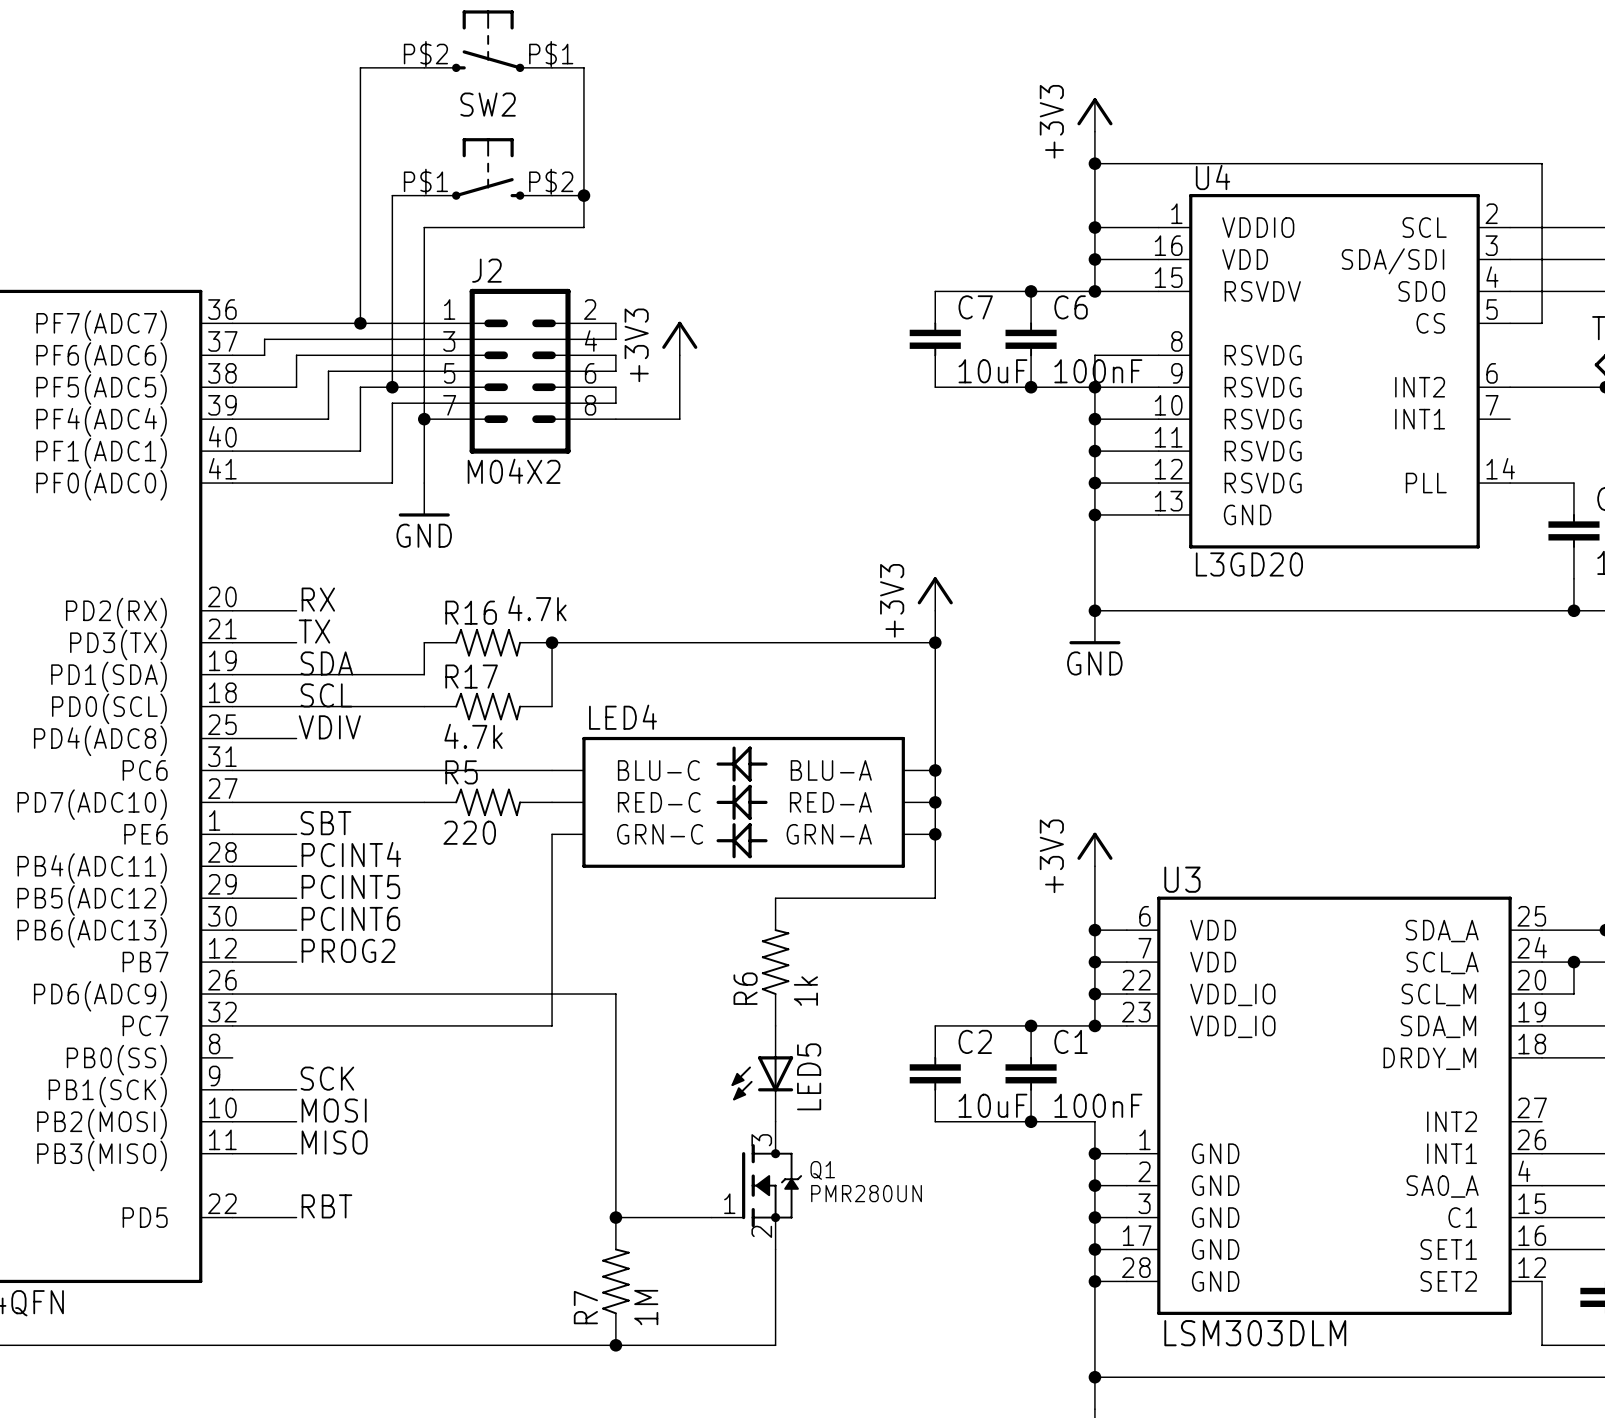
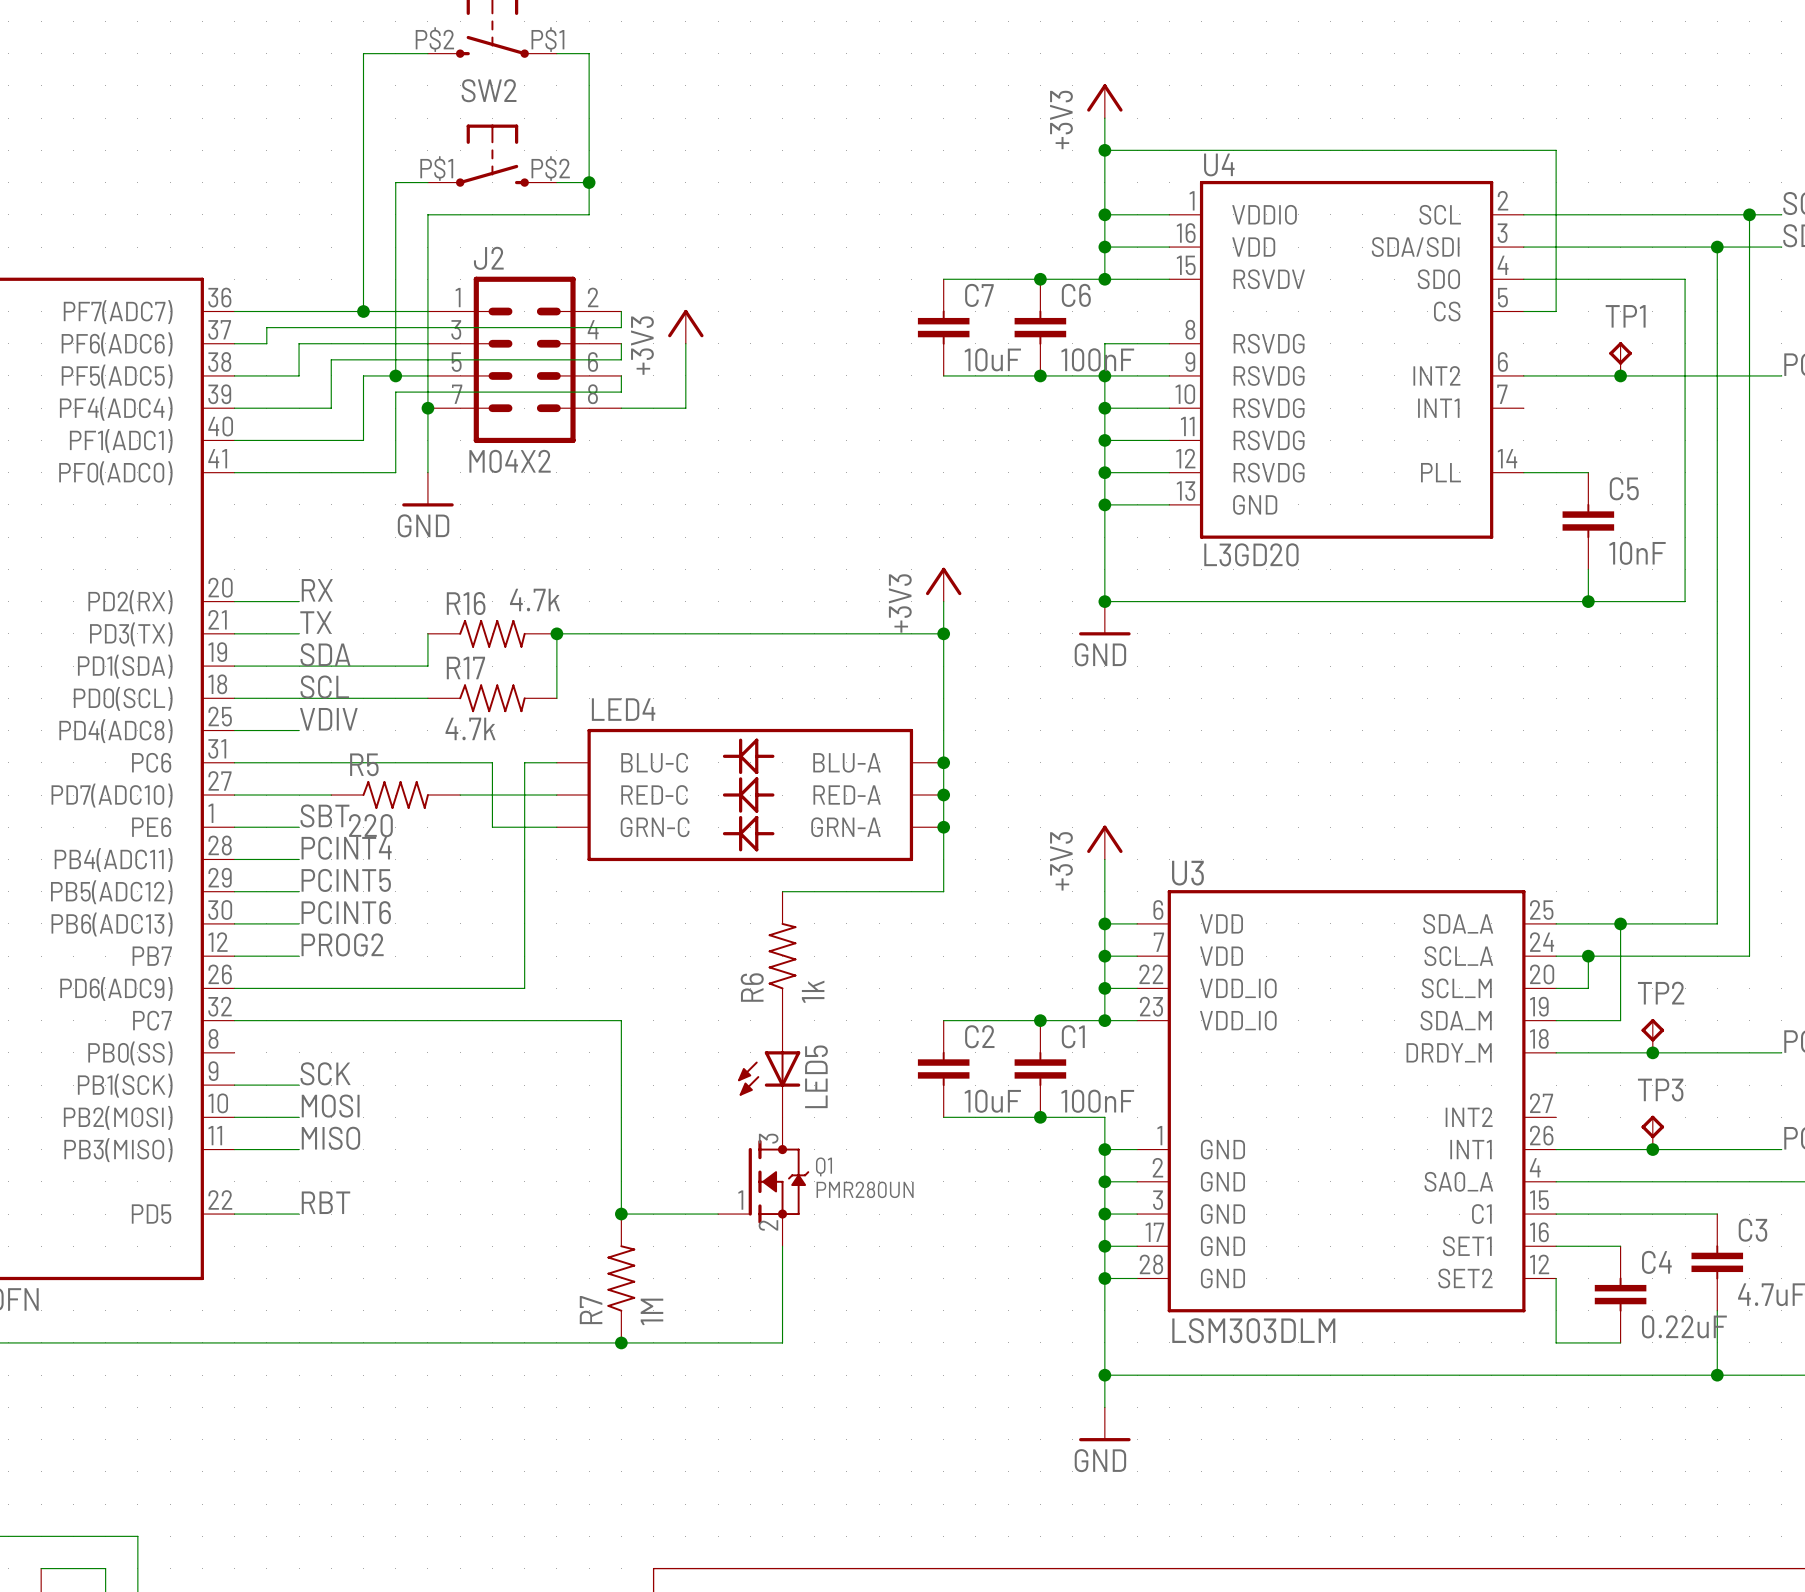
wire: (488, 770) (520, 770) -> (492, 762) (492, 827) (556, 827)
wire: none -> (524, 762) (524, 988)
R5 position: (488, 802) -> (395, 795)
wire: (552, 834) (552, 1025) -> none
wire: (520, 994) (615, 994) (615, 1025) -> (556, 1020) (621, 1020)

